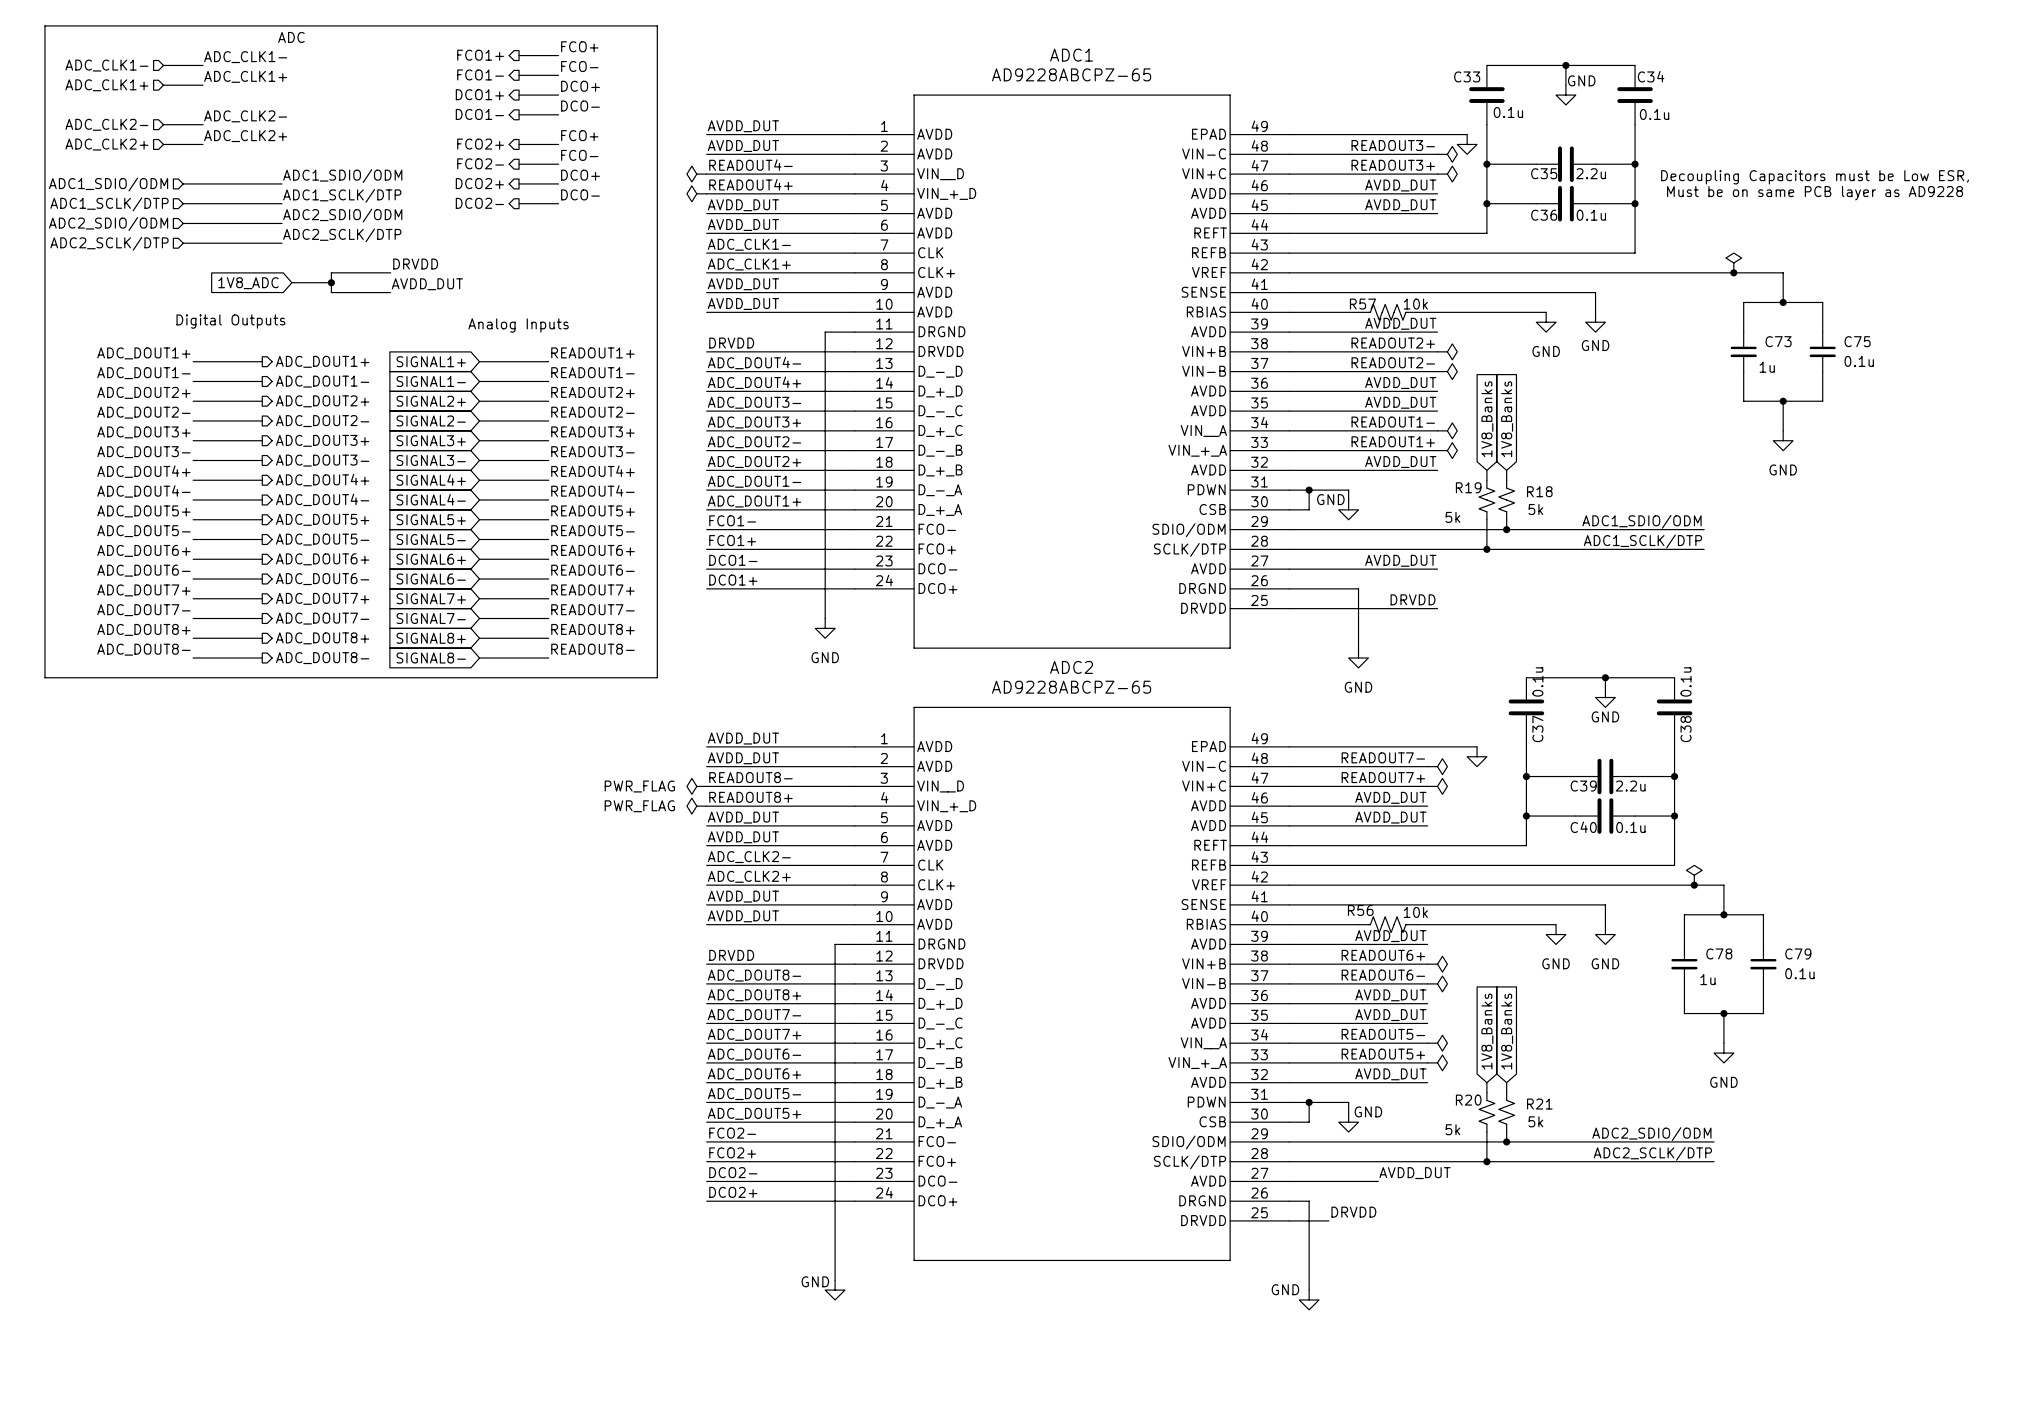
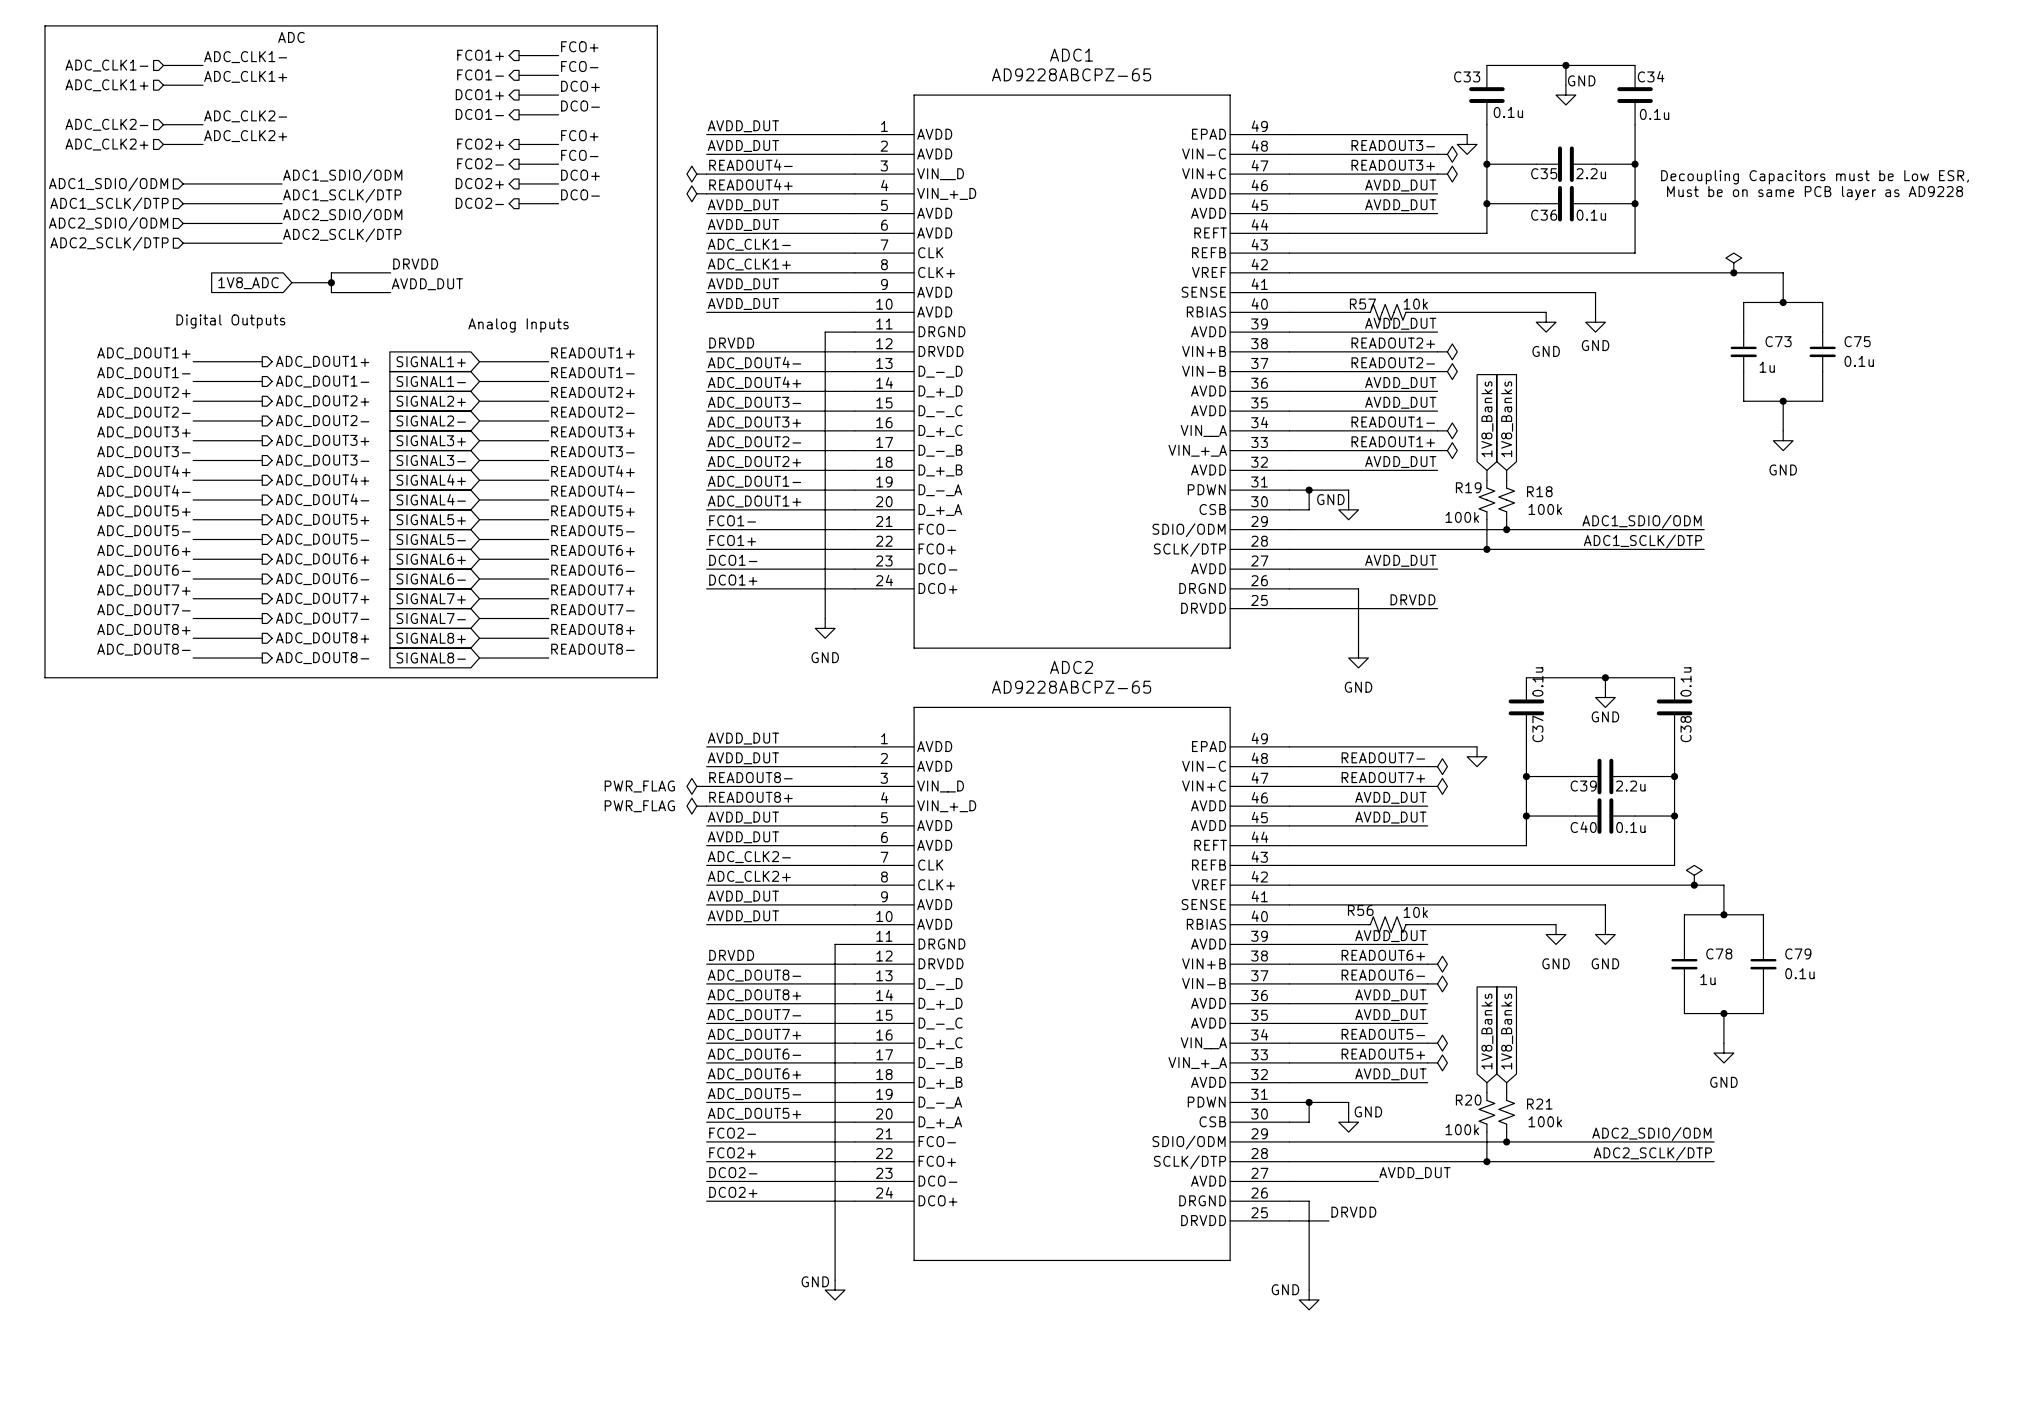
R18 value: 5k (1535, 509) -> 100k (1545, 509)
R19 value: 5k (1452, 517) -> 100k (1462, 517)
R21 value: 5k (1535, 1121) -> 100k (1545, 1121)
R20 value: 5k (1452, 1129) -> 100k (1462, 1129)

